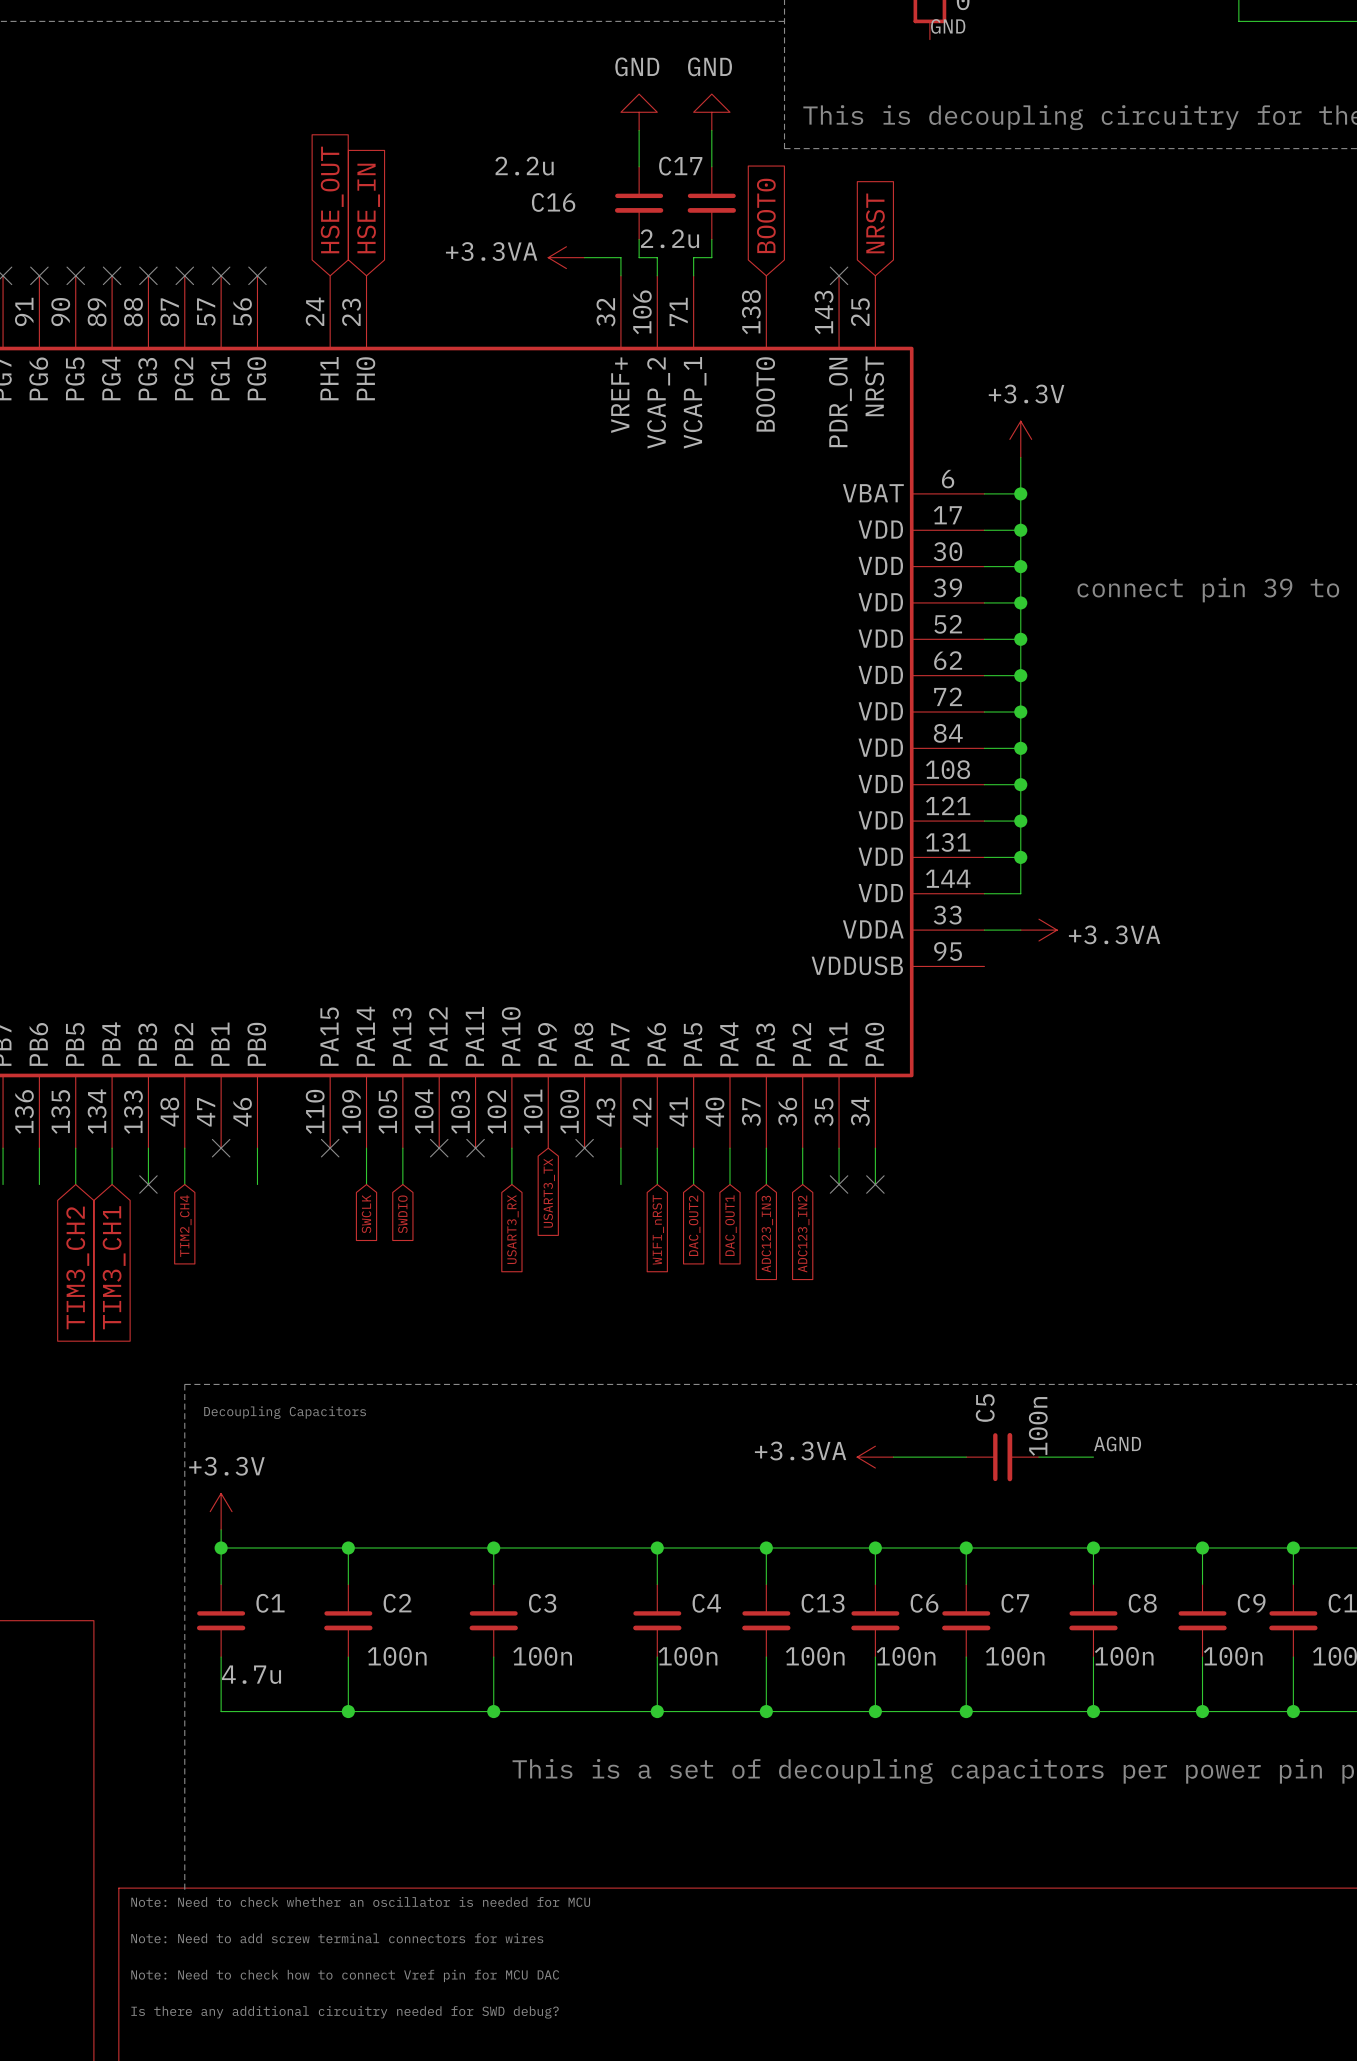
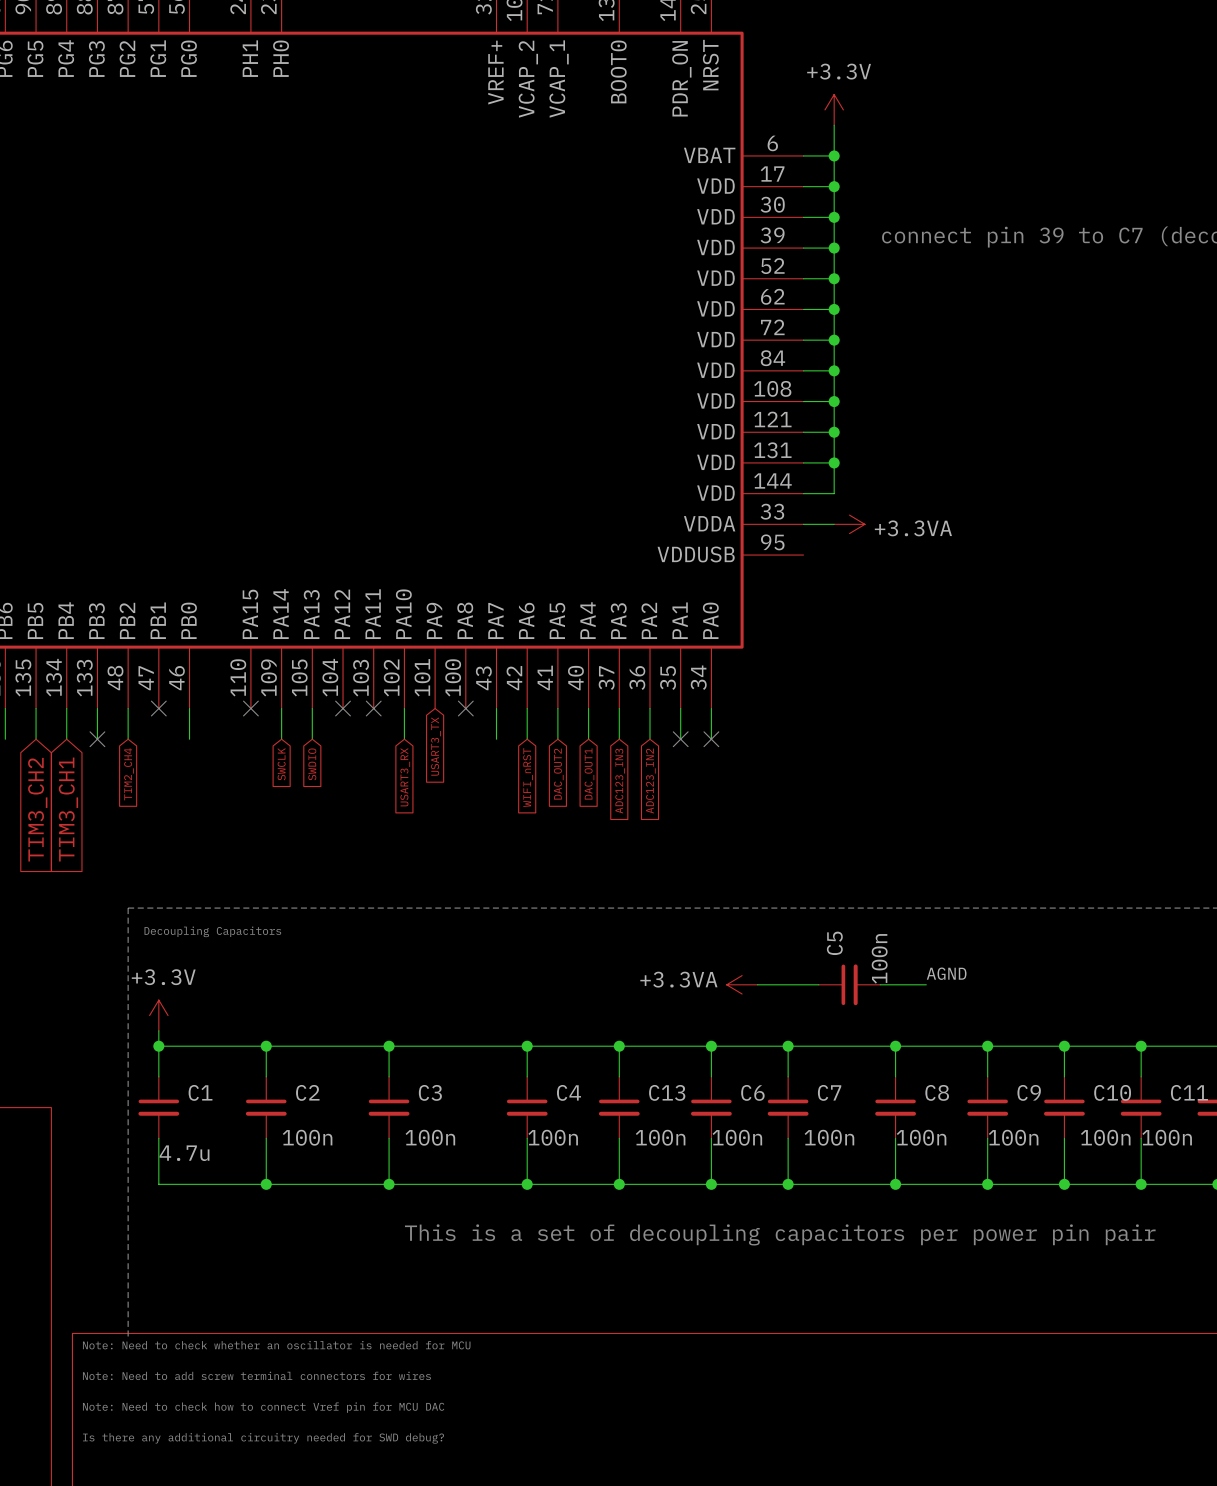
label position: AGND (1117, 1444) -> AGND (946, 973)
power symbol position: +3.3VA (875, 1457) -> +3.3VA (742, 984)
wire: (893, 1457) (966, 1457) -> (757, 984) (818, 984)
C5 position: (1002, 1457) -> (849, 984)
wire: (1038, 1457) (1093, 1457) -> (880, 984) (926, 984)

